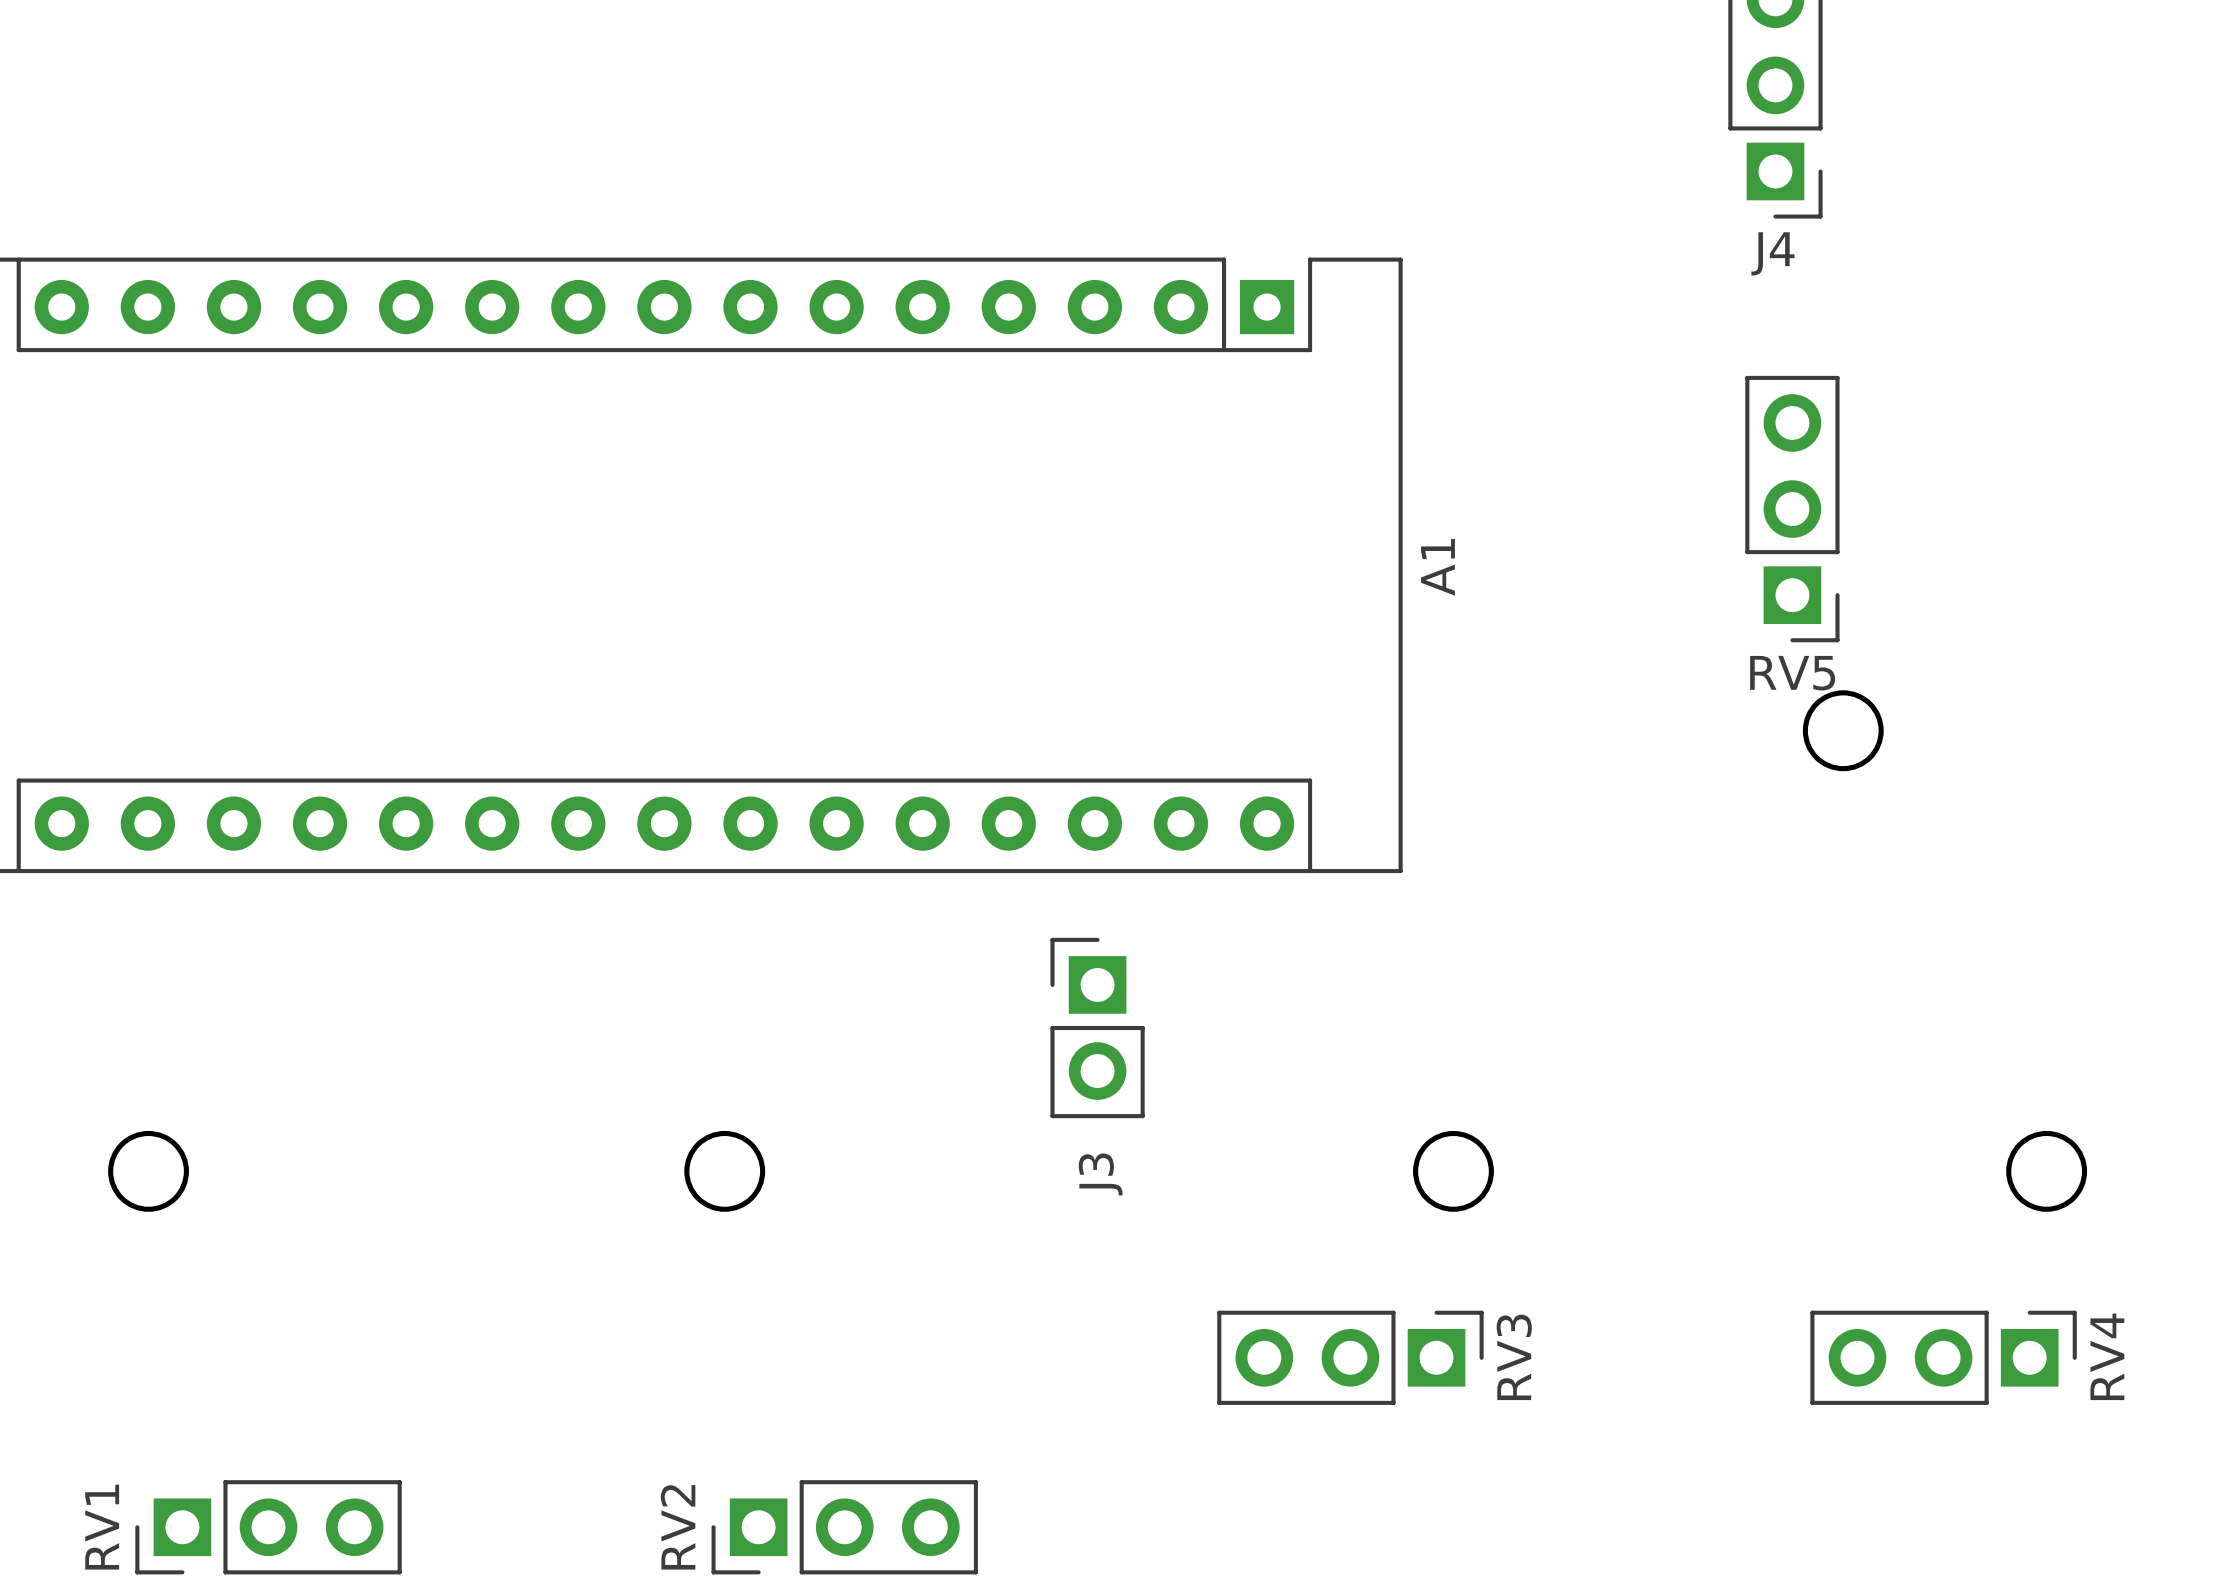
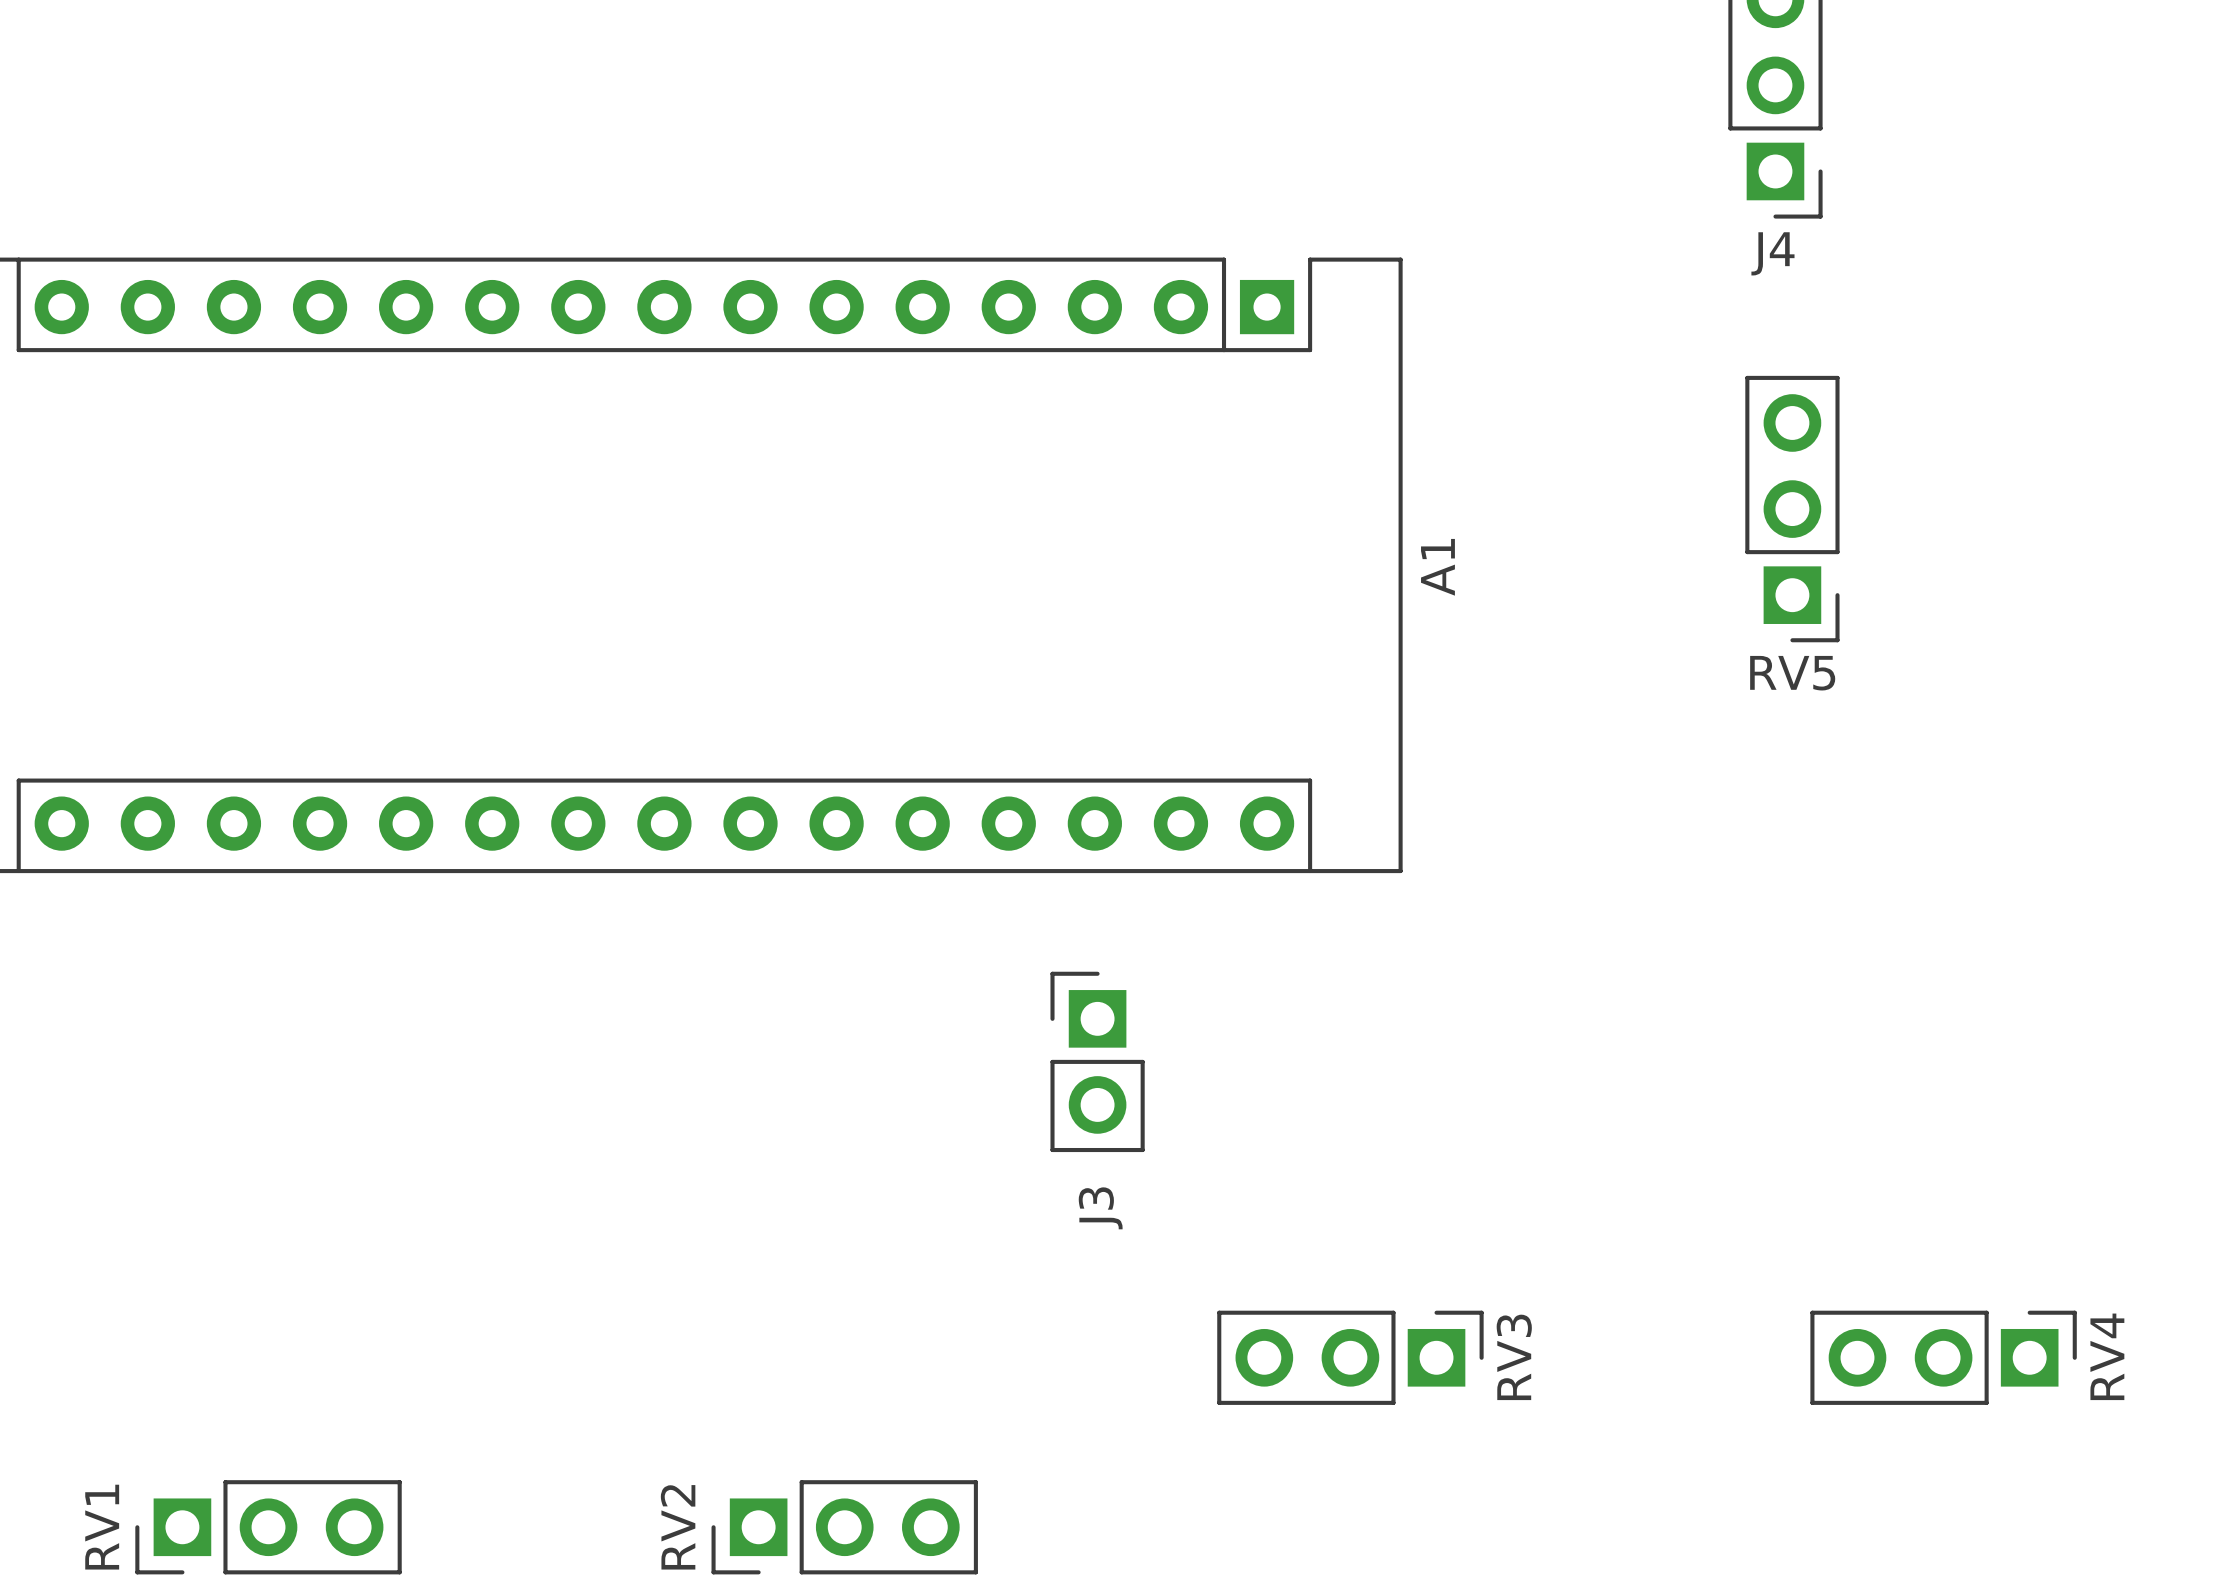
round board edge: [1802, 690, 1884, 772] -> none
J3 position: (1097, 1028) -> (1097, 1061)
round board edge: [108, 1130, 189, 1212] -> none
round board edge: [684, 1130, 766, 1212] -> none
round board edge: [1413, 1130, 1494, 1212] -> none
round board edge: [2006, 1130, 2088, 1212] -> none

